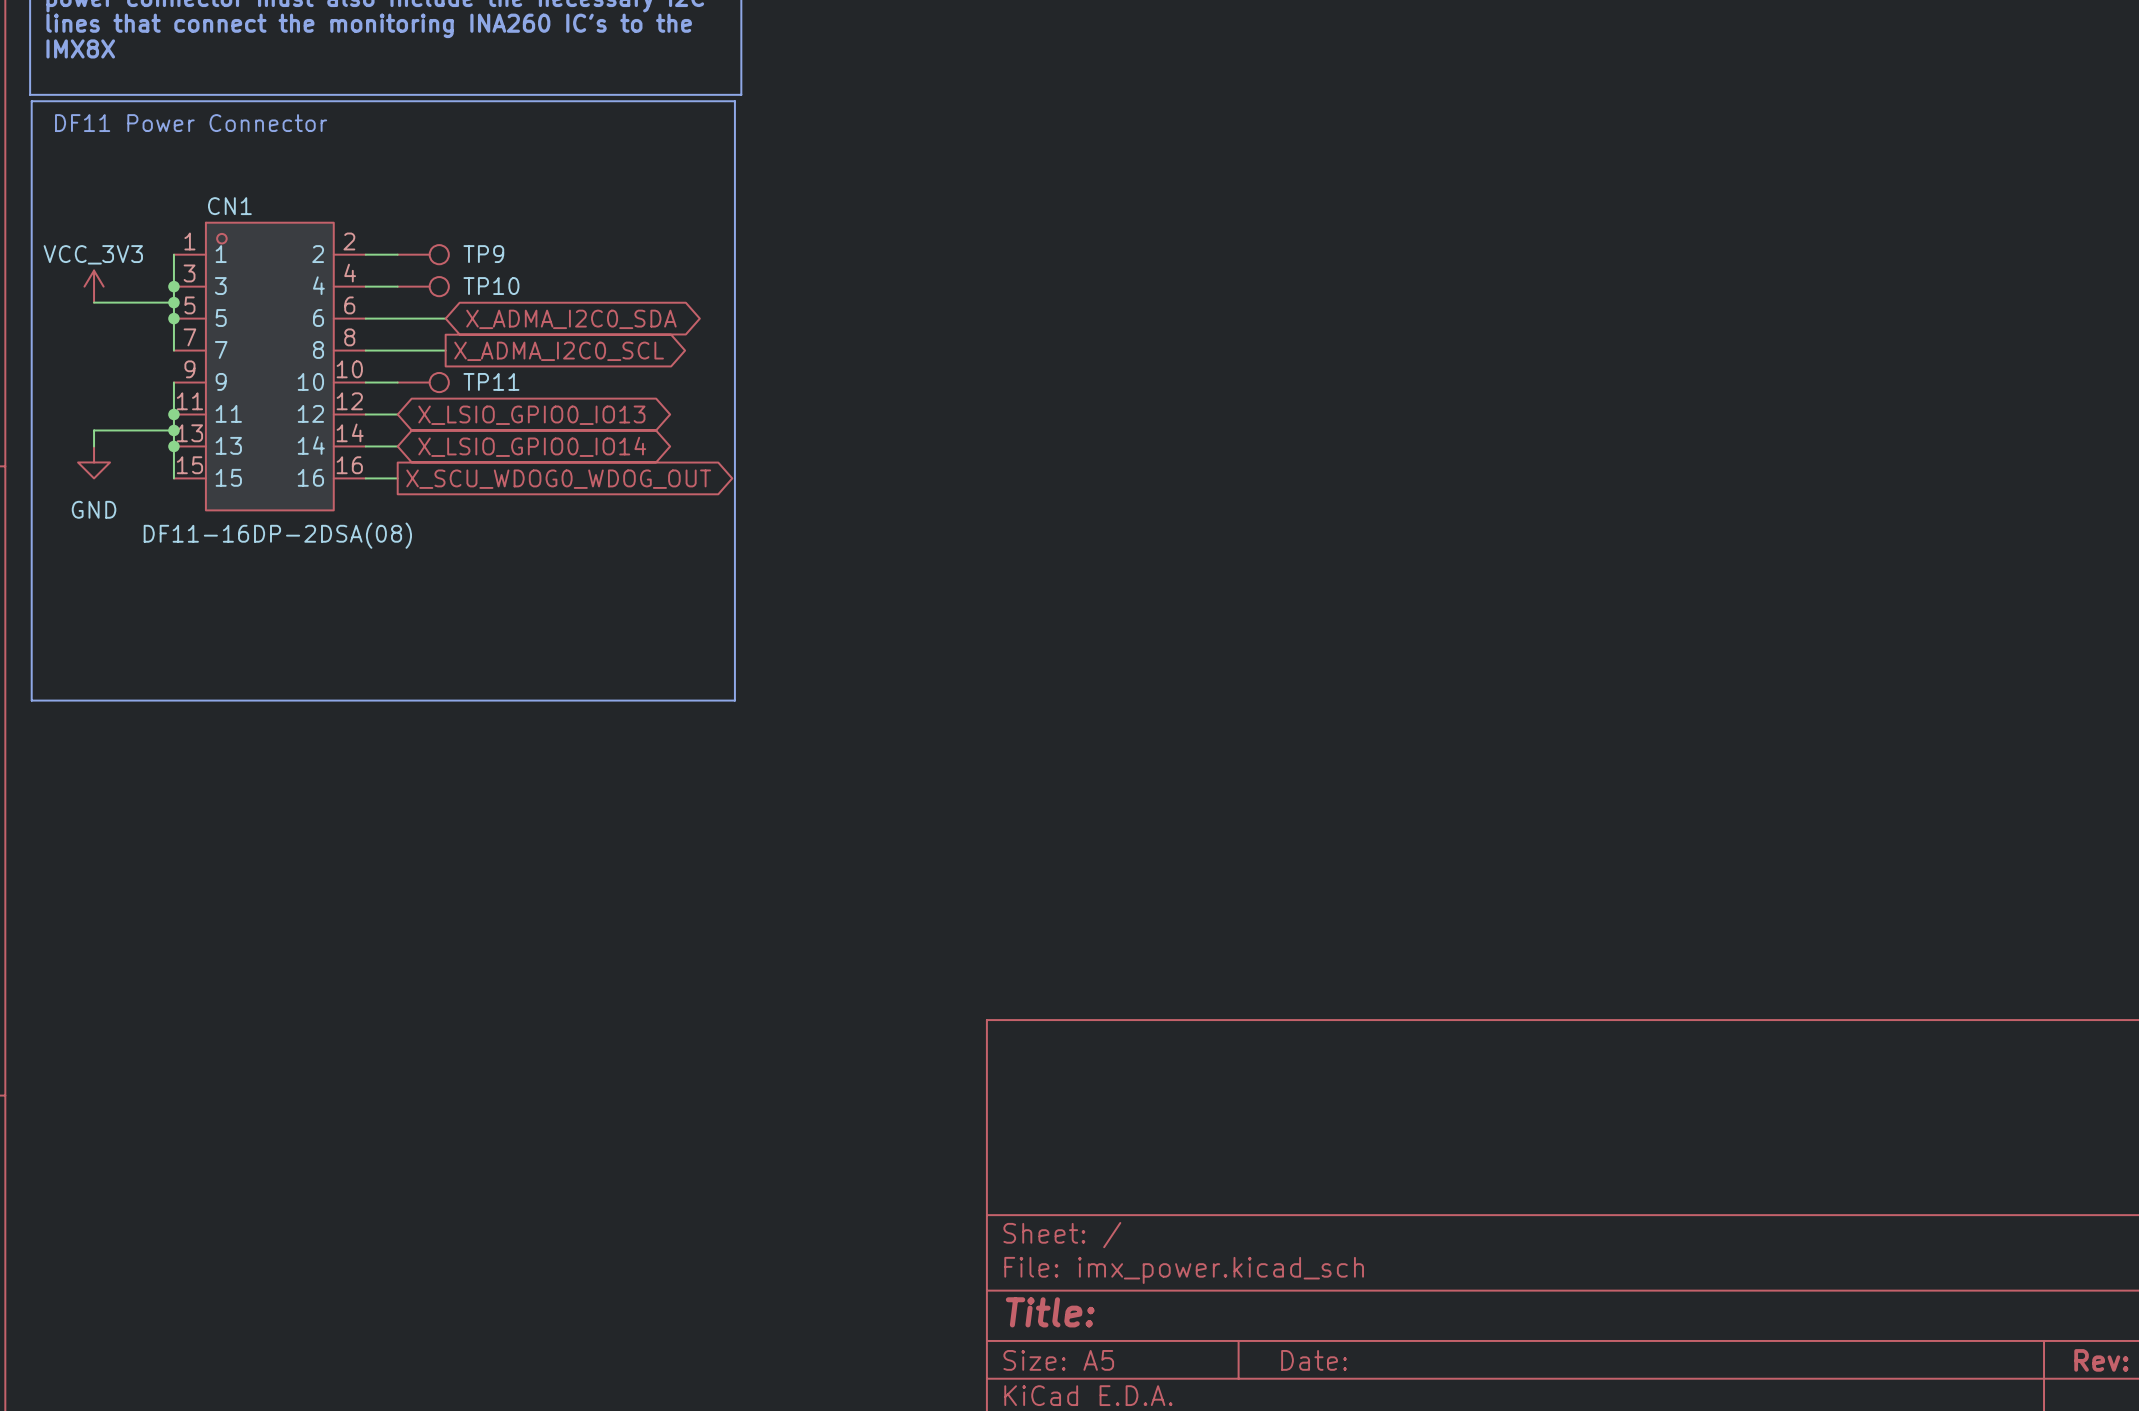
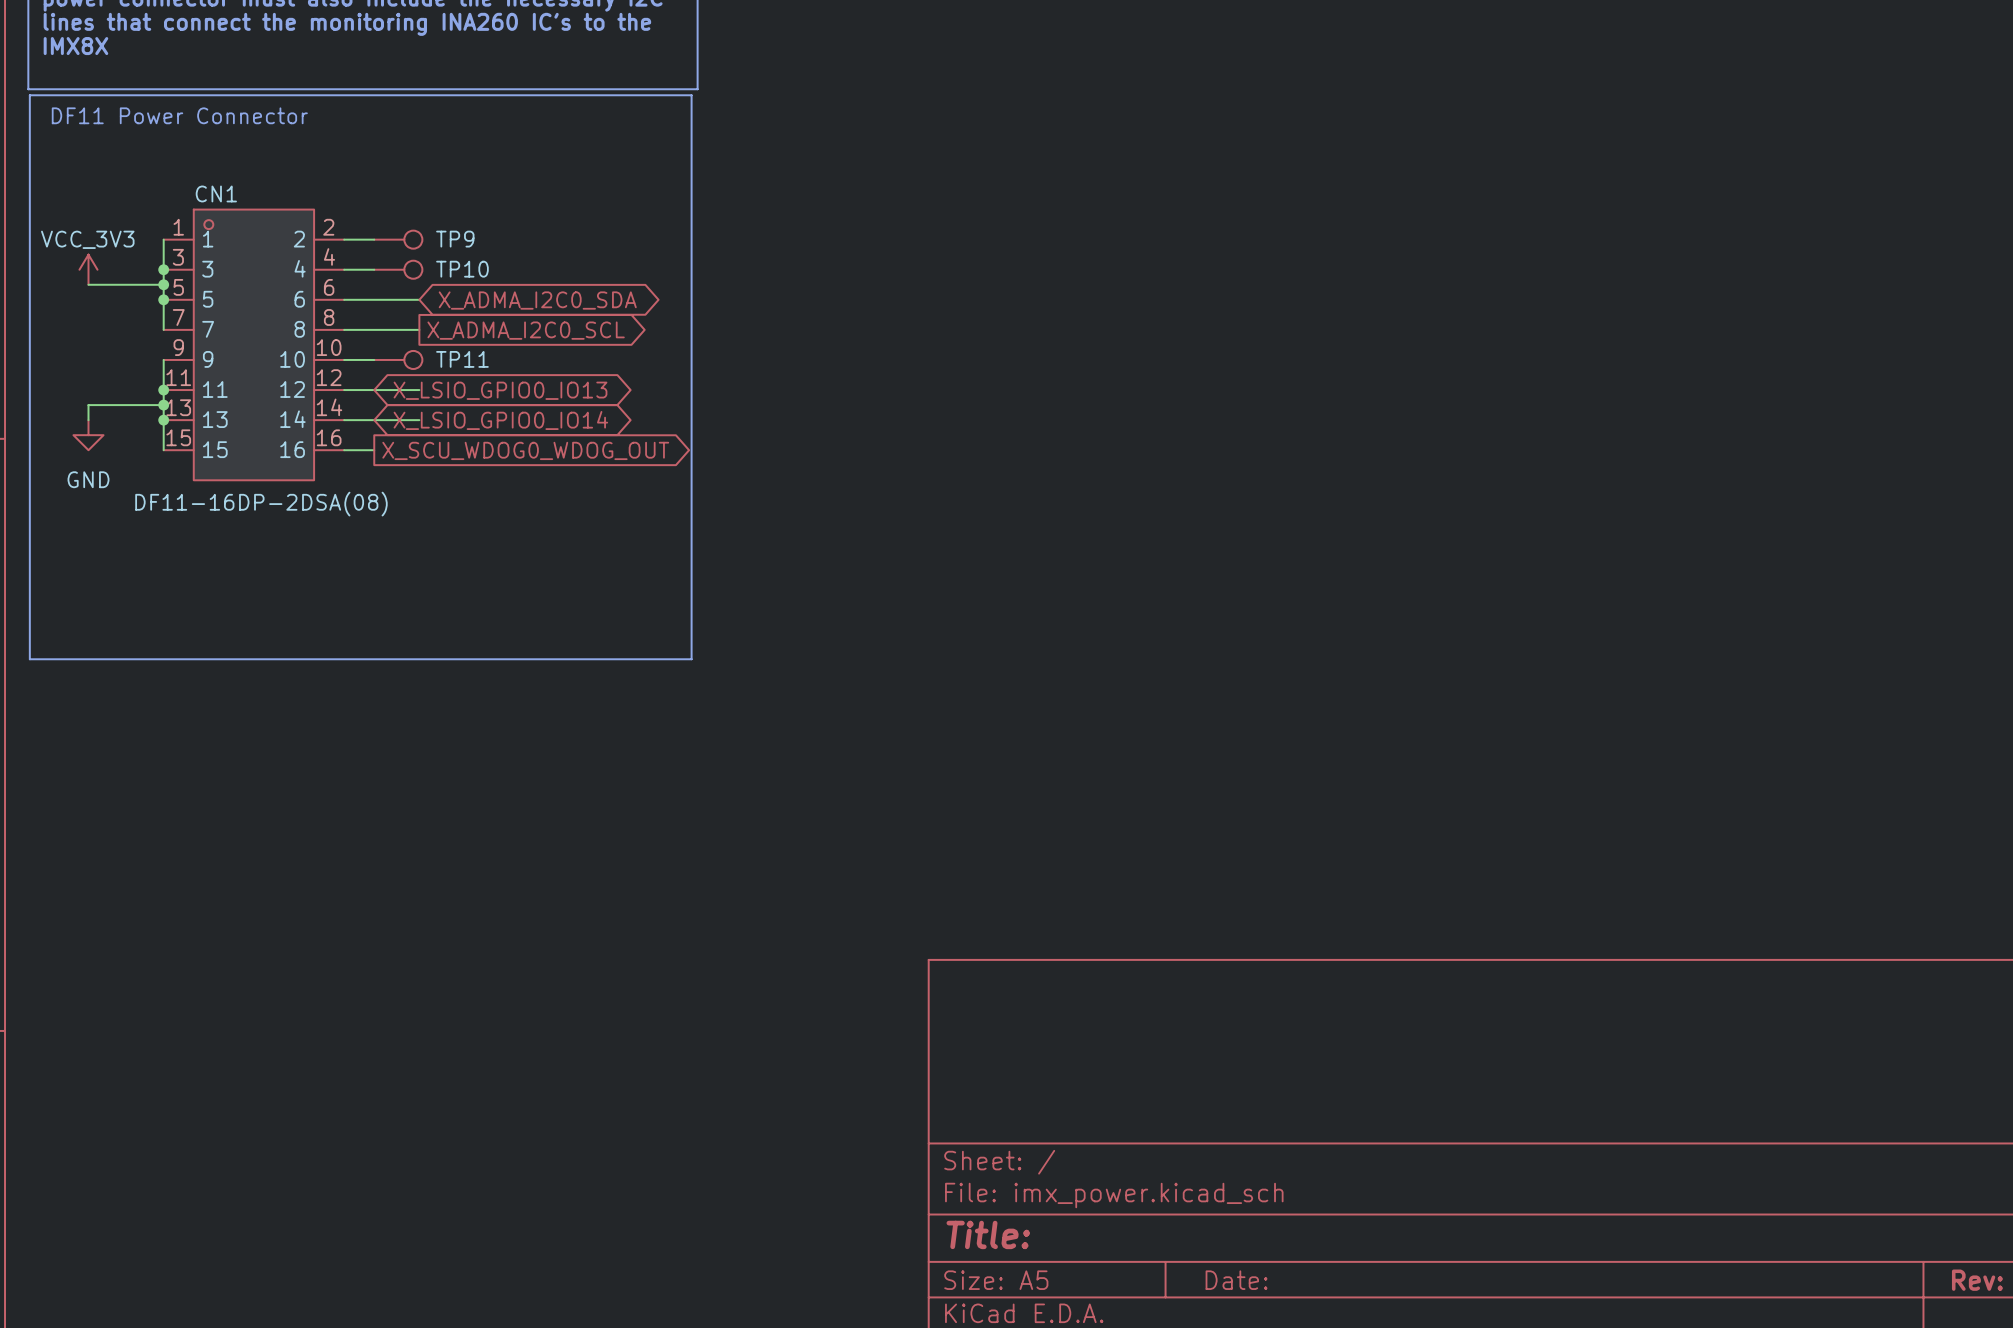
wire: none -> (374, 390) (419, 390)
wire: none -> (374, 420) (419, 420)

